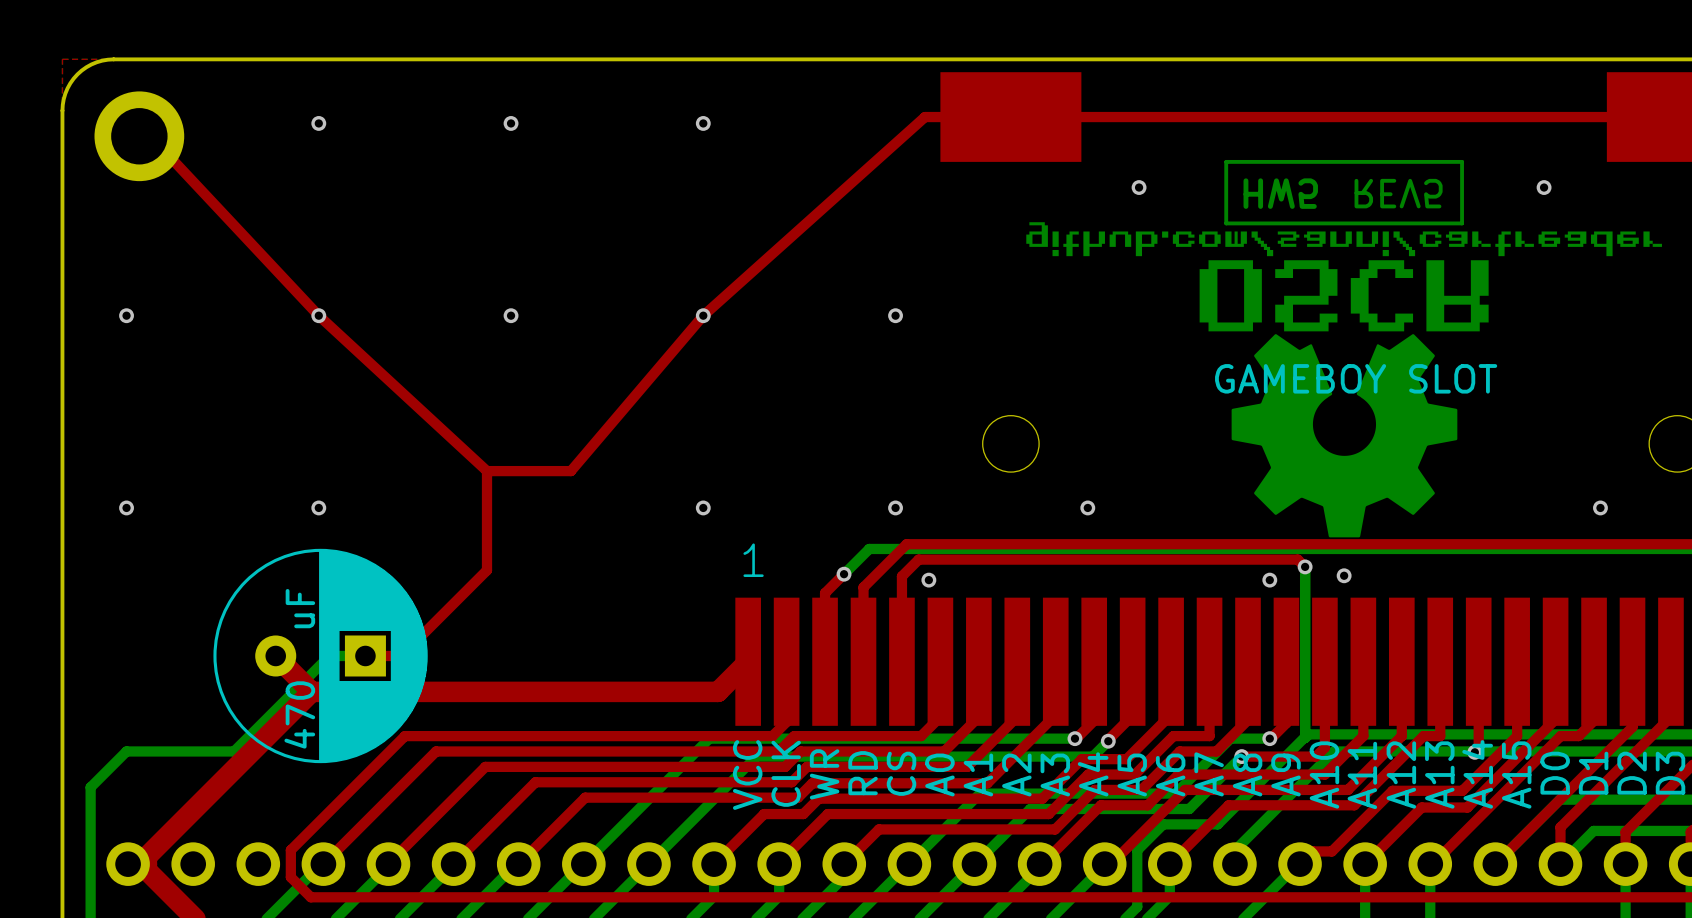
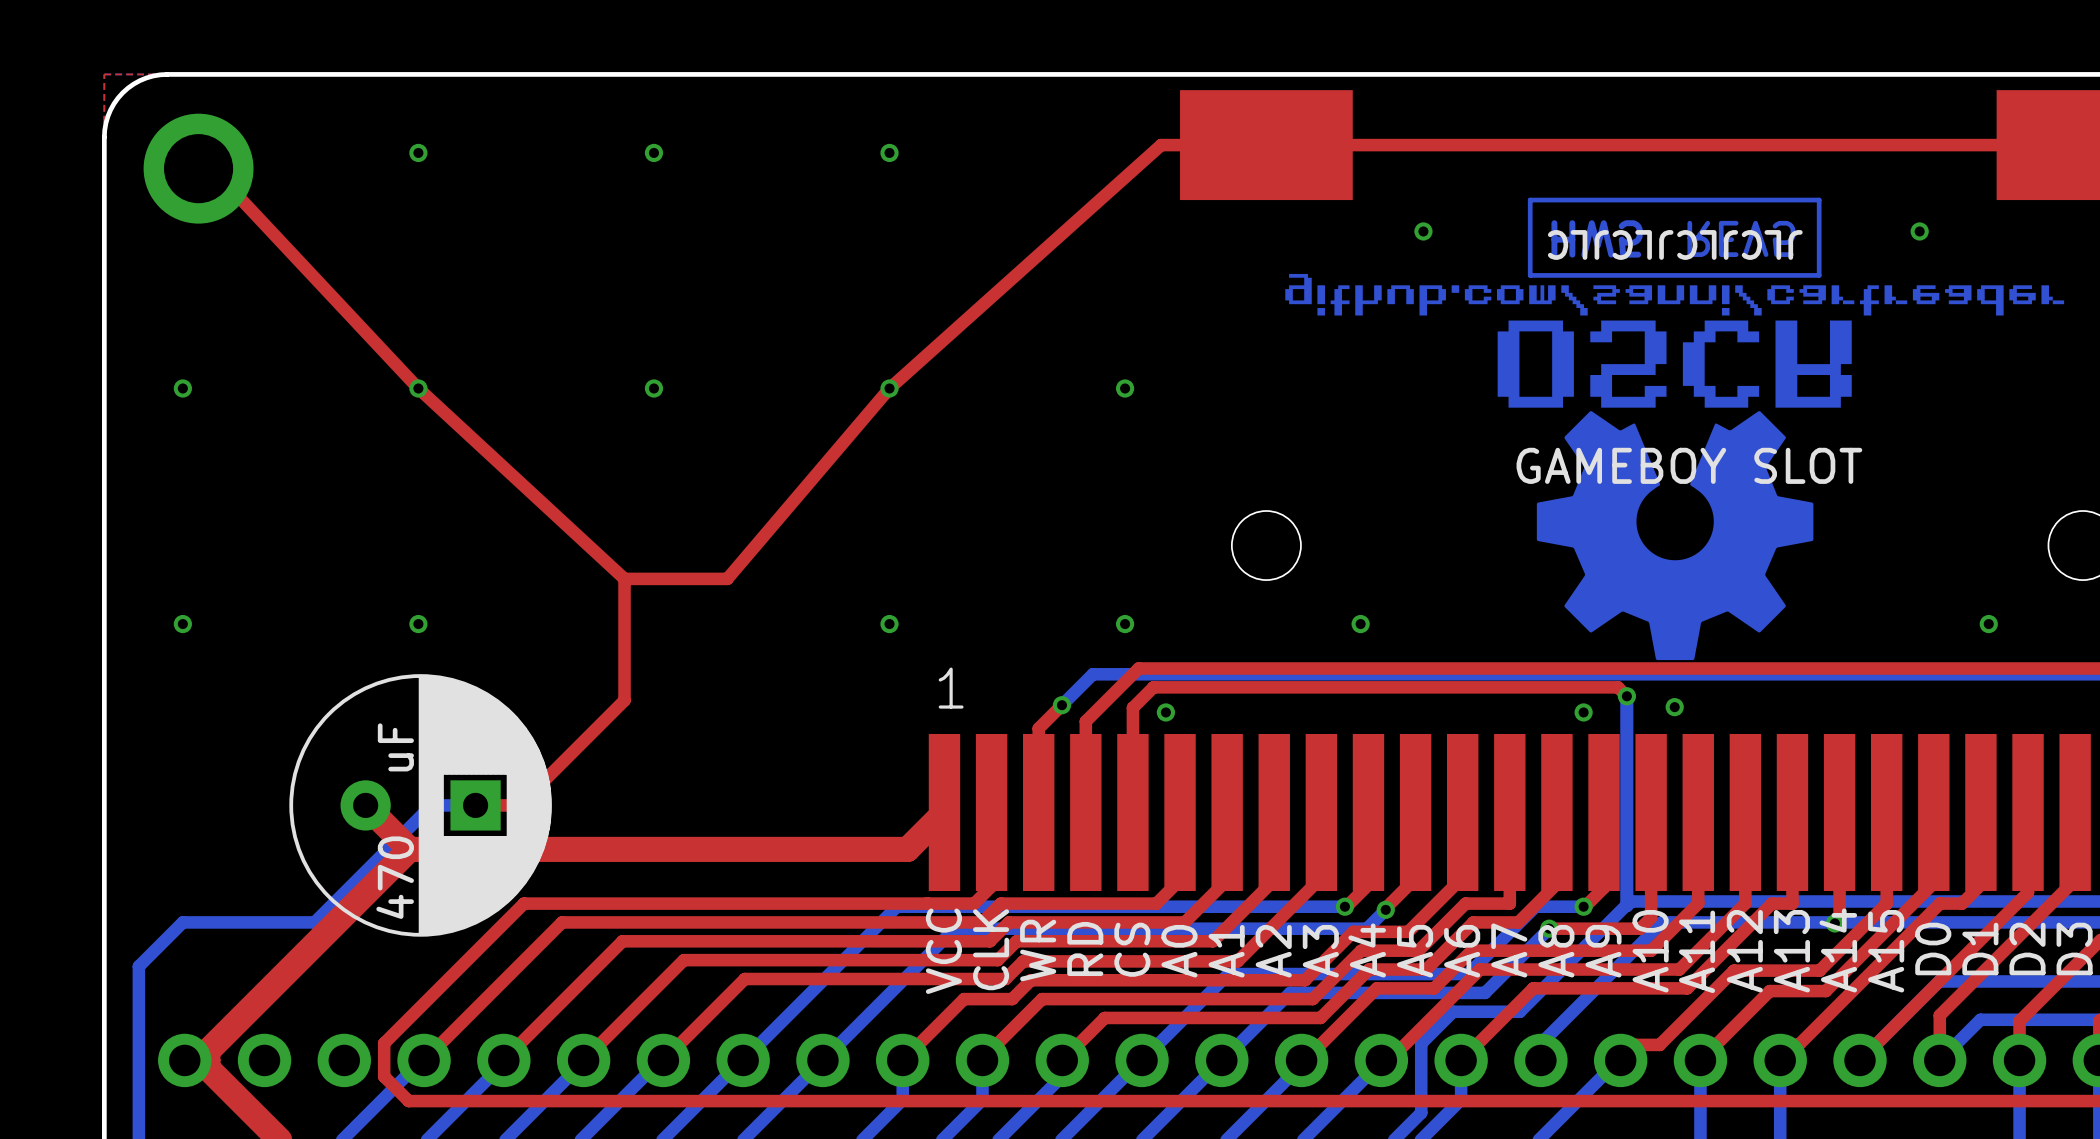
text: none -> JLCJLCJLCJLC (1675, 244)

